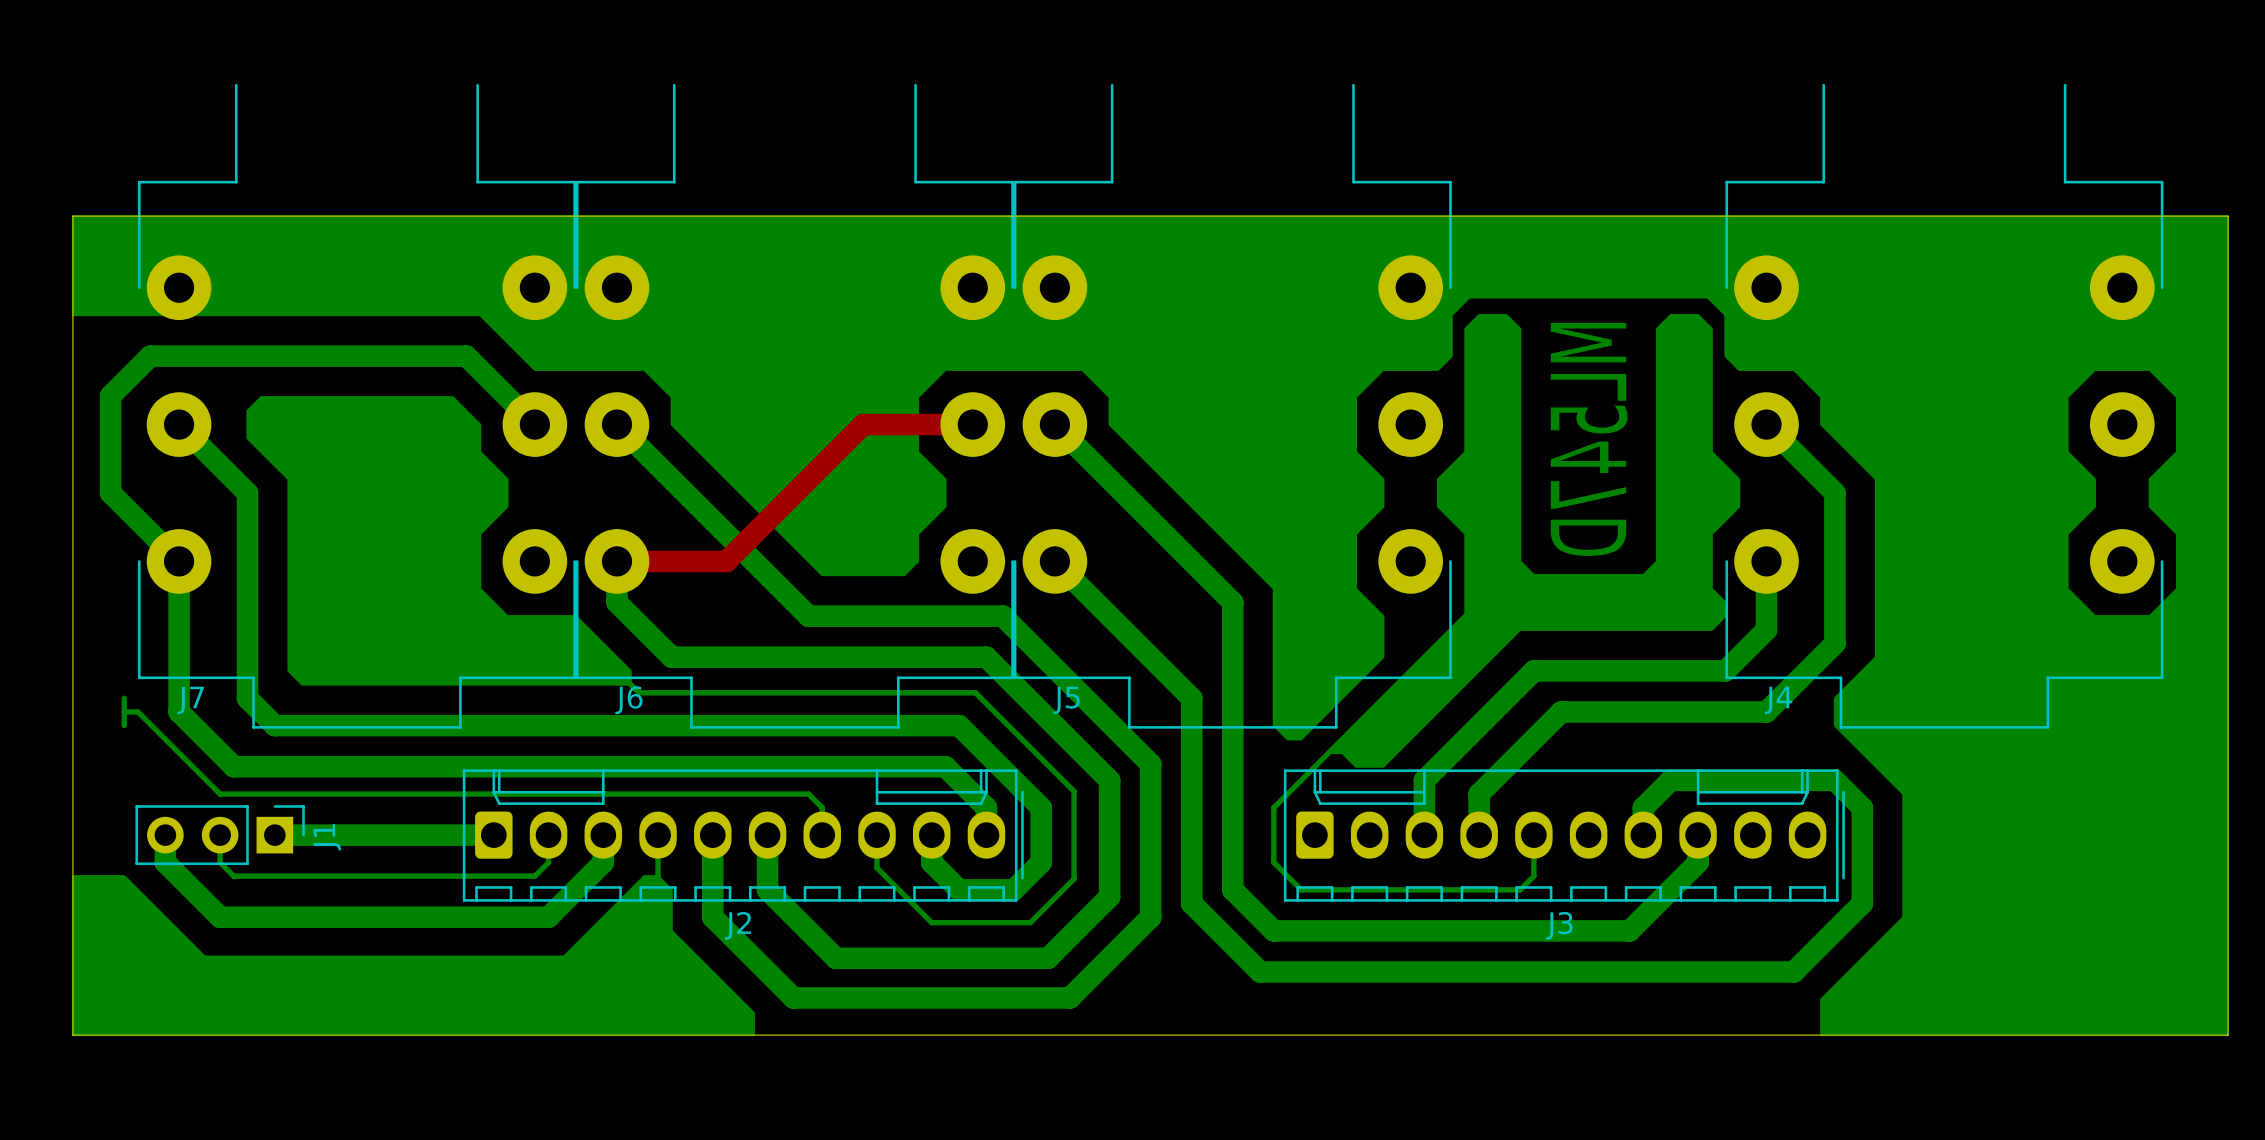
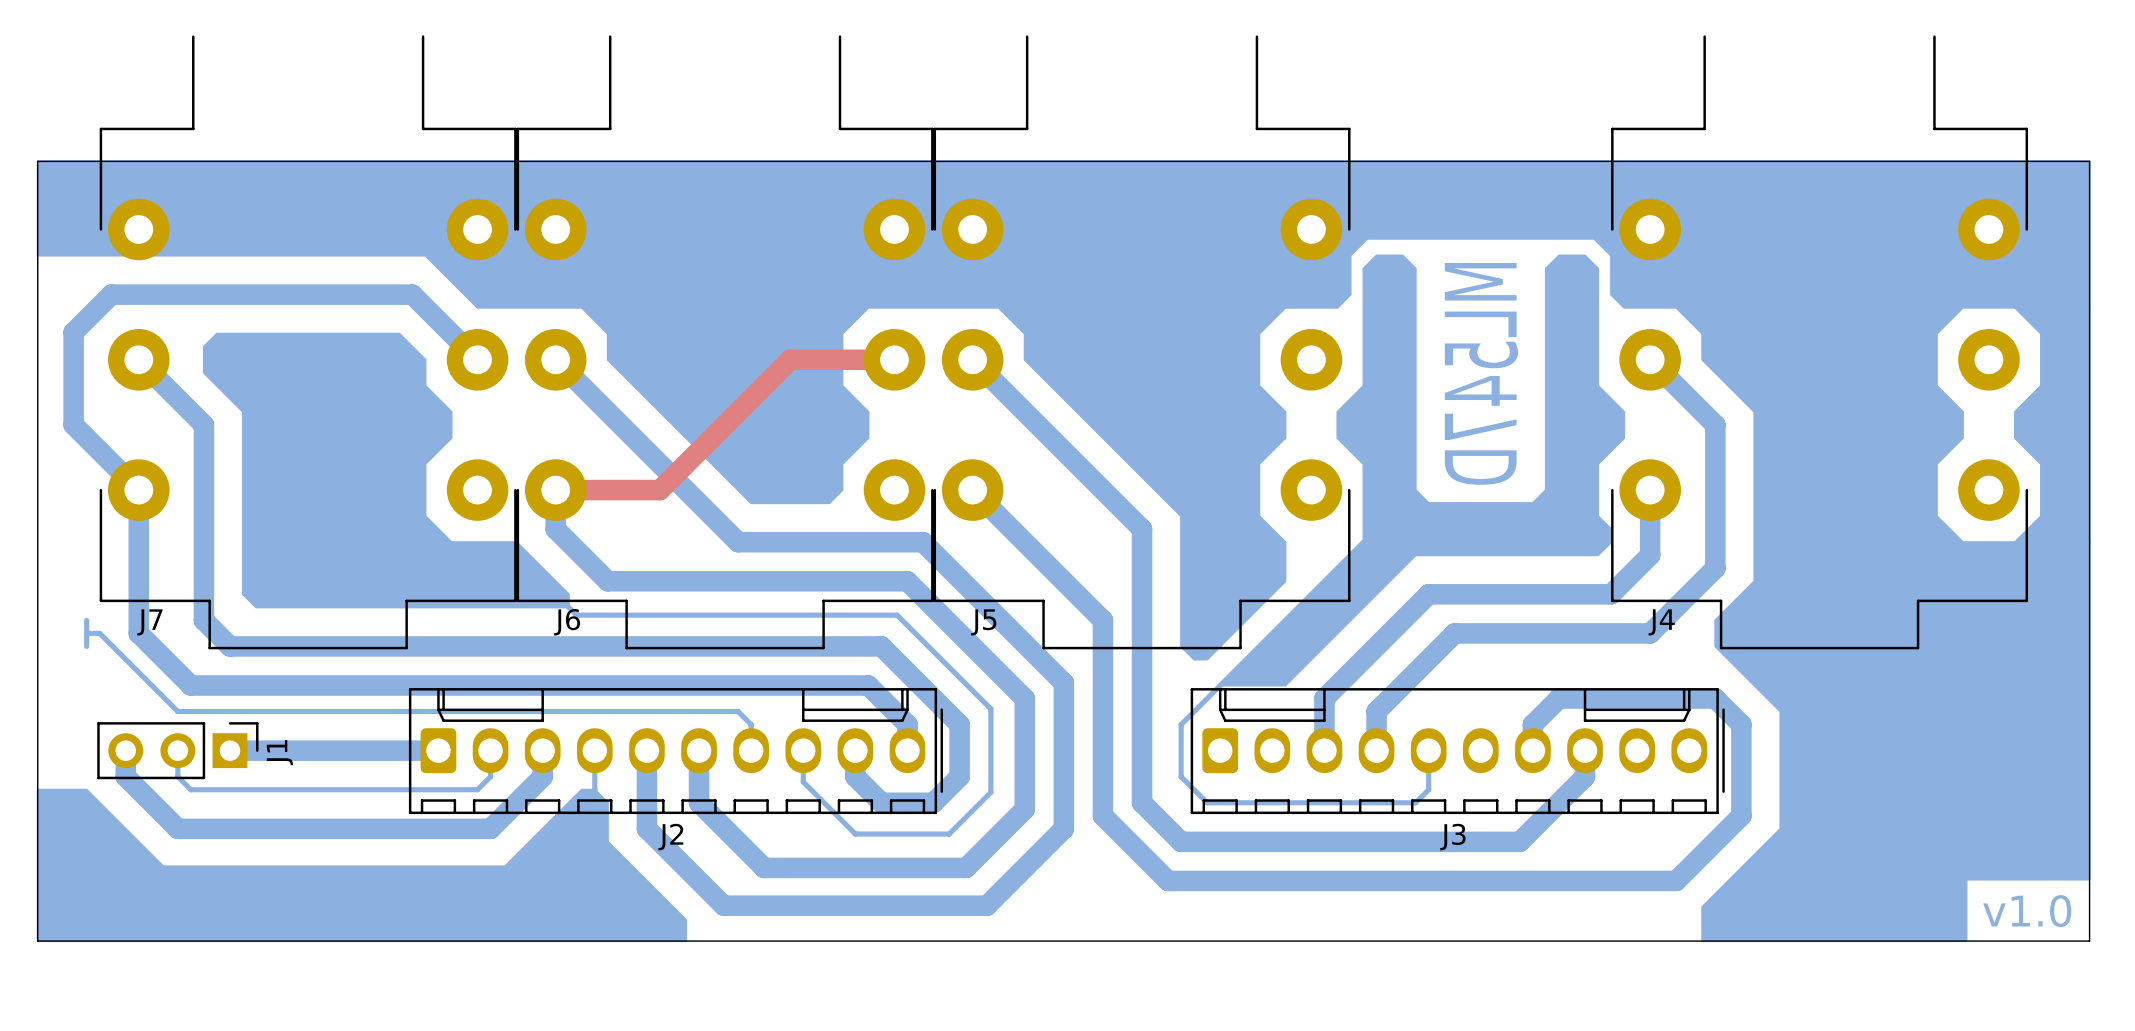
drawing shape: [1724, 215, 2230, 1037] -> [1610, 160, 2091, 943]
drawing shape: [1327, 314, 1741, 768] -> [1219, 254, 1626, 687]
text: none -> v1.0 (2027, 911)

